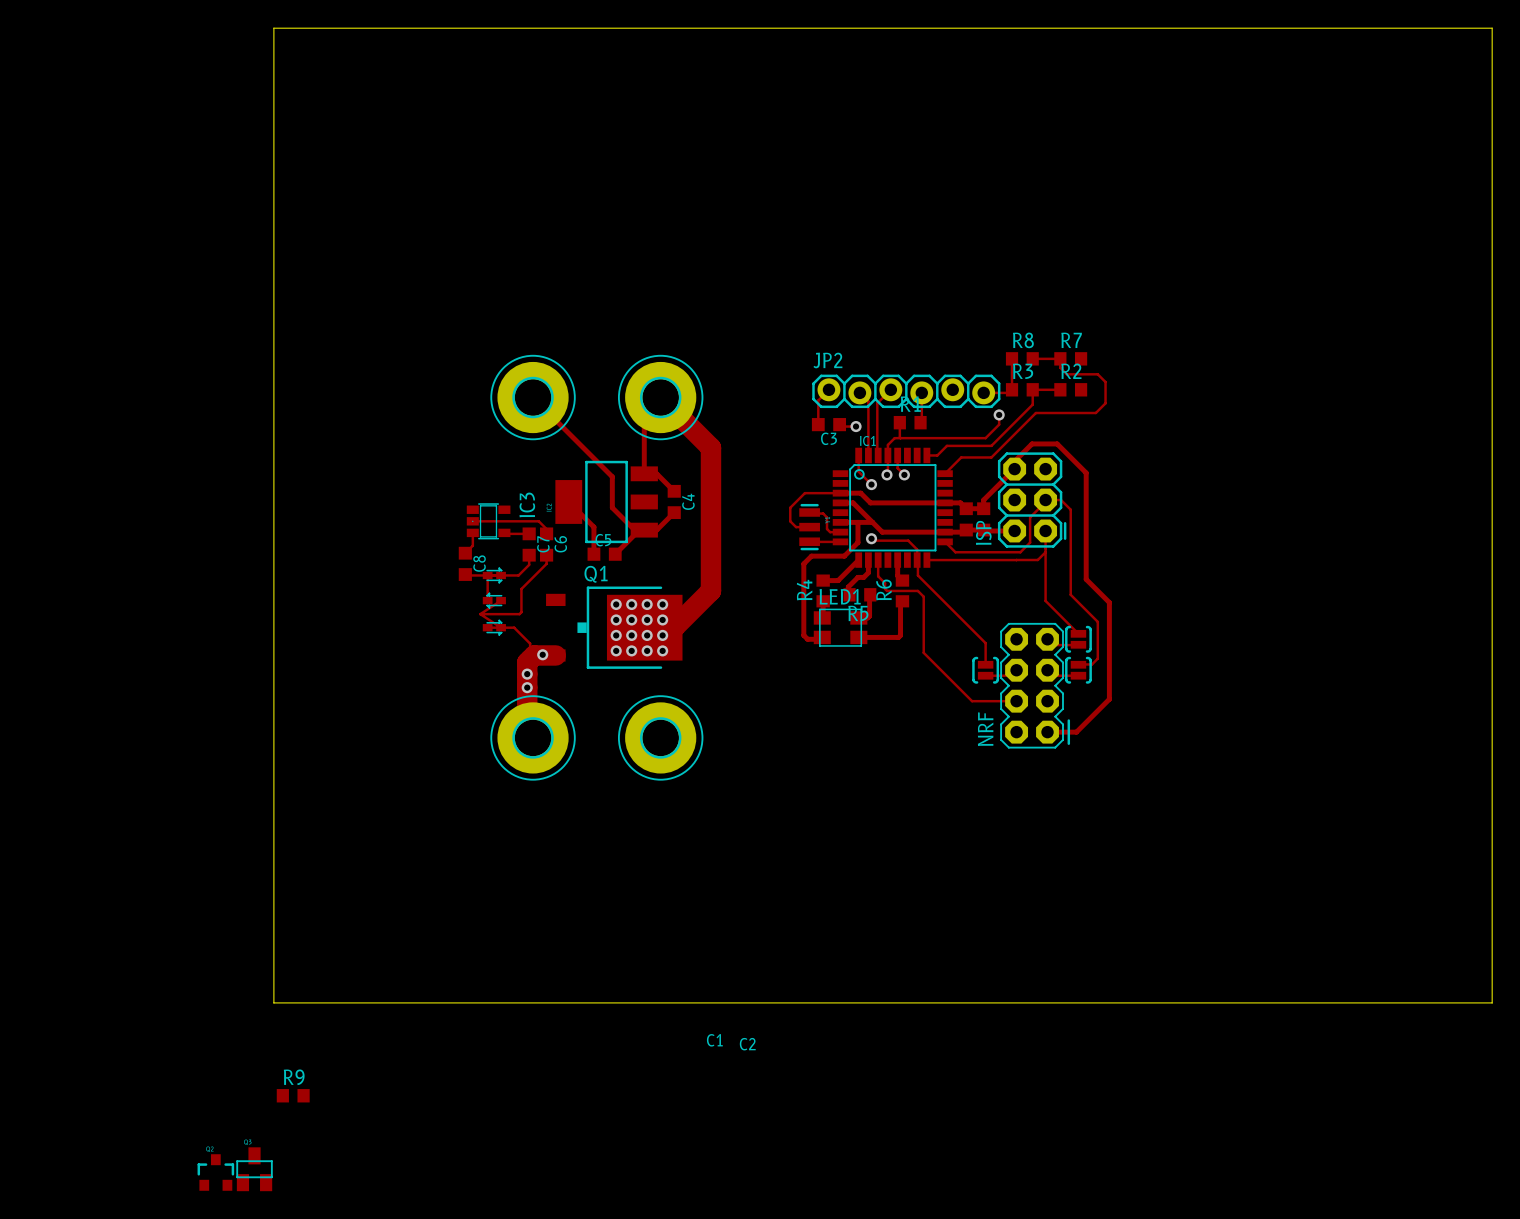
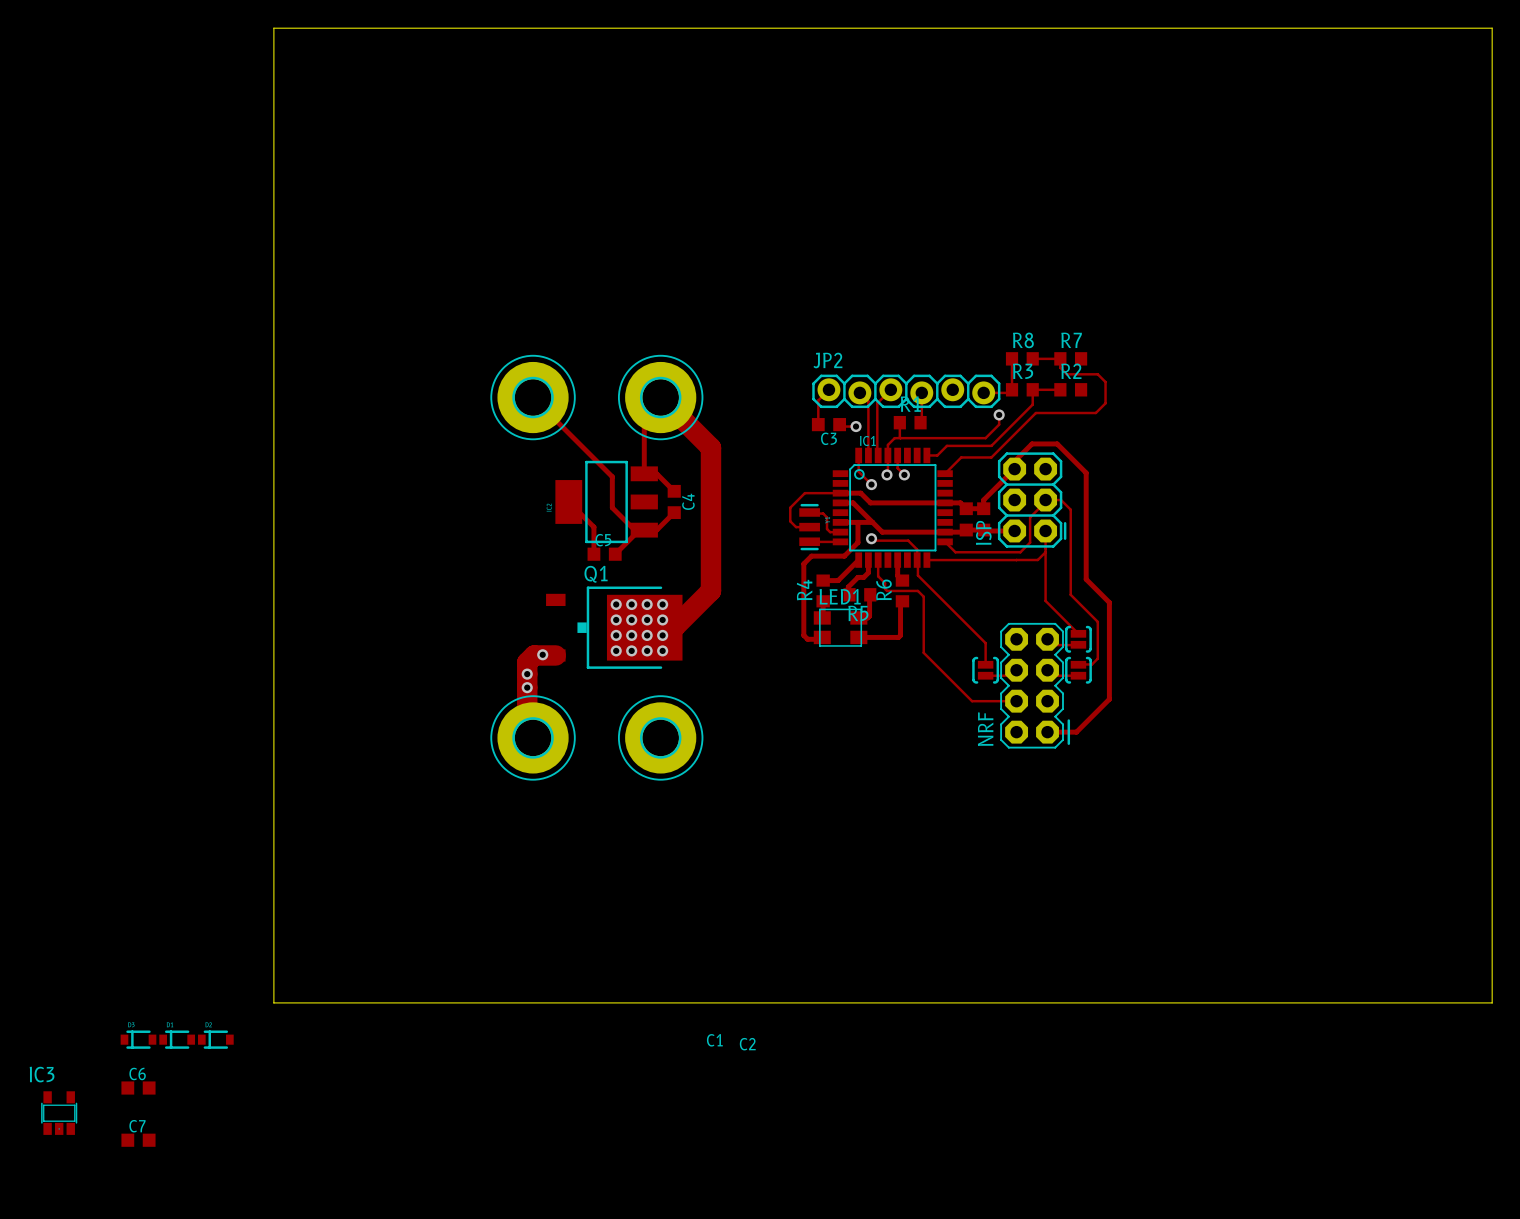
track: (472, 521) (538, 521) (546, 529) (546, 533) -> none
IC3 rotation: 0° (488, 521) -> 90° counterclockwise (59, 1113)
IC3 position: (488, 521) -> (59, 1113)
track: (472, 532) (472, 545) (465, 553) -> none
track: (504, 532) (529, 533) -> none
C7 rotation: 0° (529, 544) -> 90° clockwise (138, 1140)
C7 position: (529, 544) -> (138, 1140)
C6 rotation: 0° (546, 544) -> 90° clockwise (138, 1088)
C6 position: (546, 544) -> (138, 1088)
track: (529, 555) (529, 564) (518, 575) (465, 574) -> none
track: (546, 555) (546, 563) (521, 589) (521, 612) (519, 614) (480, 614) -> none
C8: (465, 563) -> none
track: (487, 575) (487, 600) -> none
part: (494, 575) -> none
part: (494, 600) -> none
track: (501, 600) (480, 614) -> none
track: (480, 614) (501, 627) -> none
track: (487, 627) (514, 627) (530, 643) (530, 659) -> none
part: (494, 627) -> none
part: none -> (138, 1039)
part: none -> (177, 1039)
part: none -> (215, 1039)
R9: (293, 1095) -> none
part: (254, 1169) -> none
part: (215, 1172) -> none

